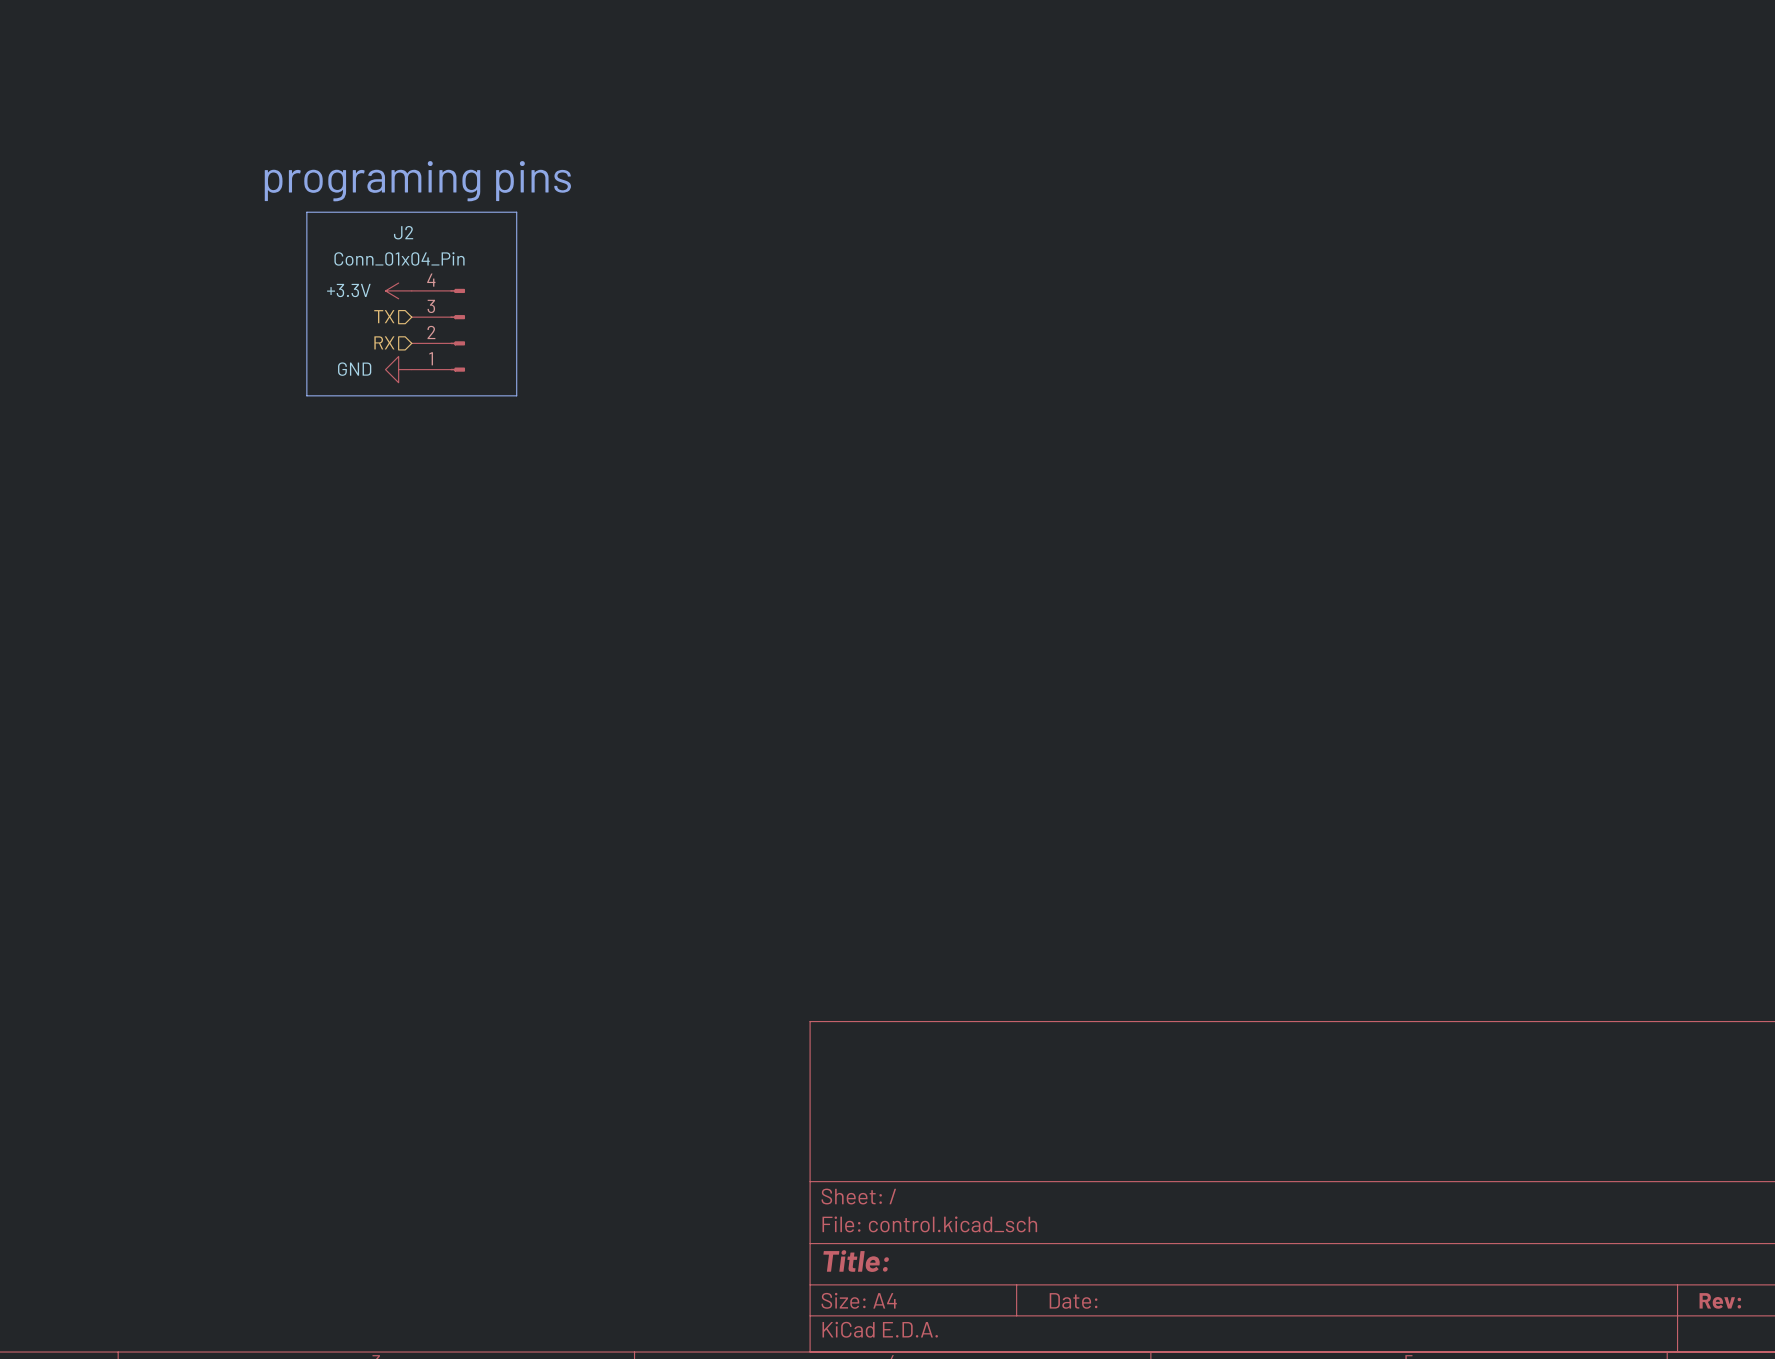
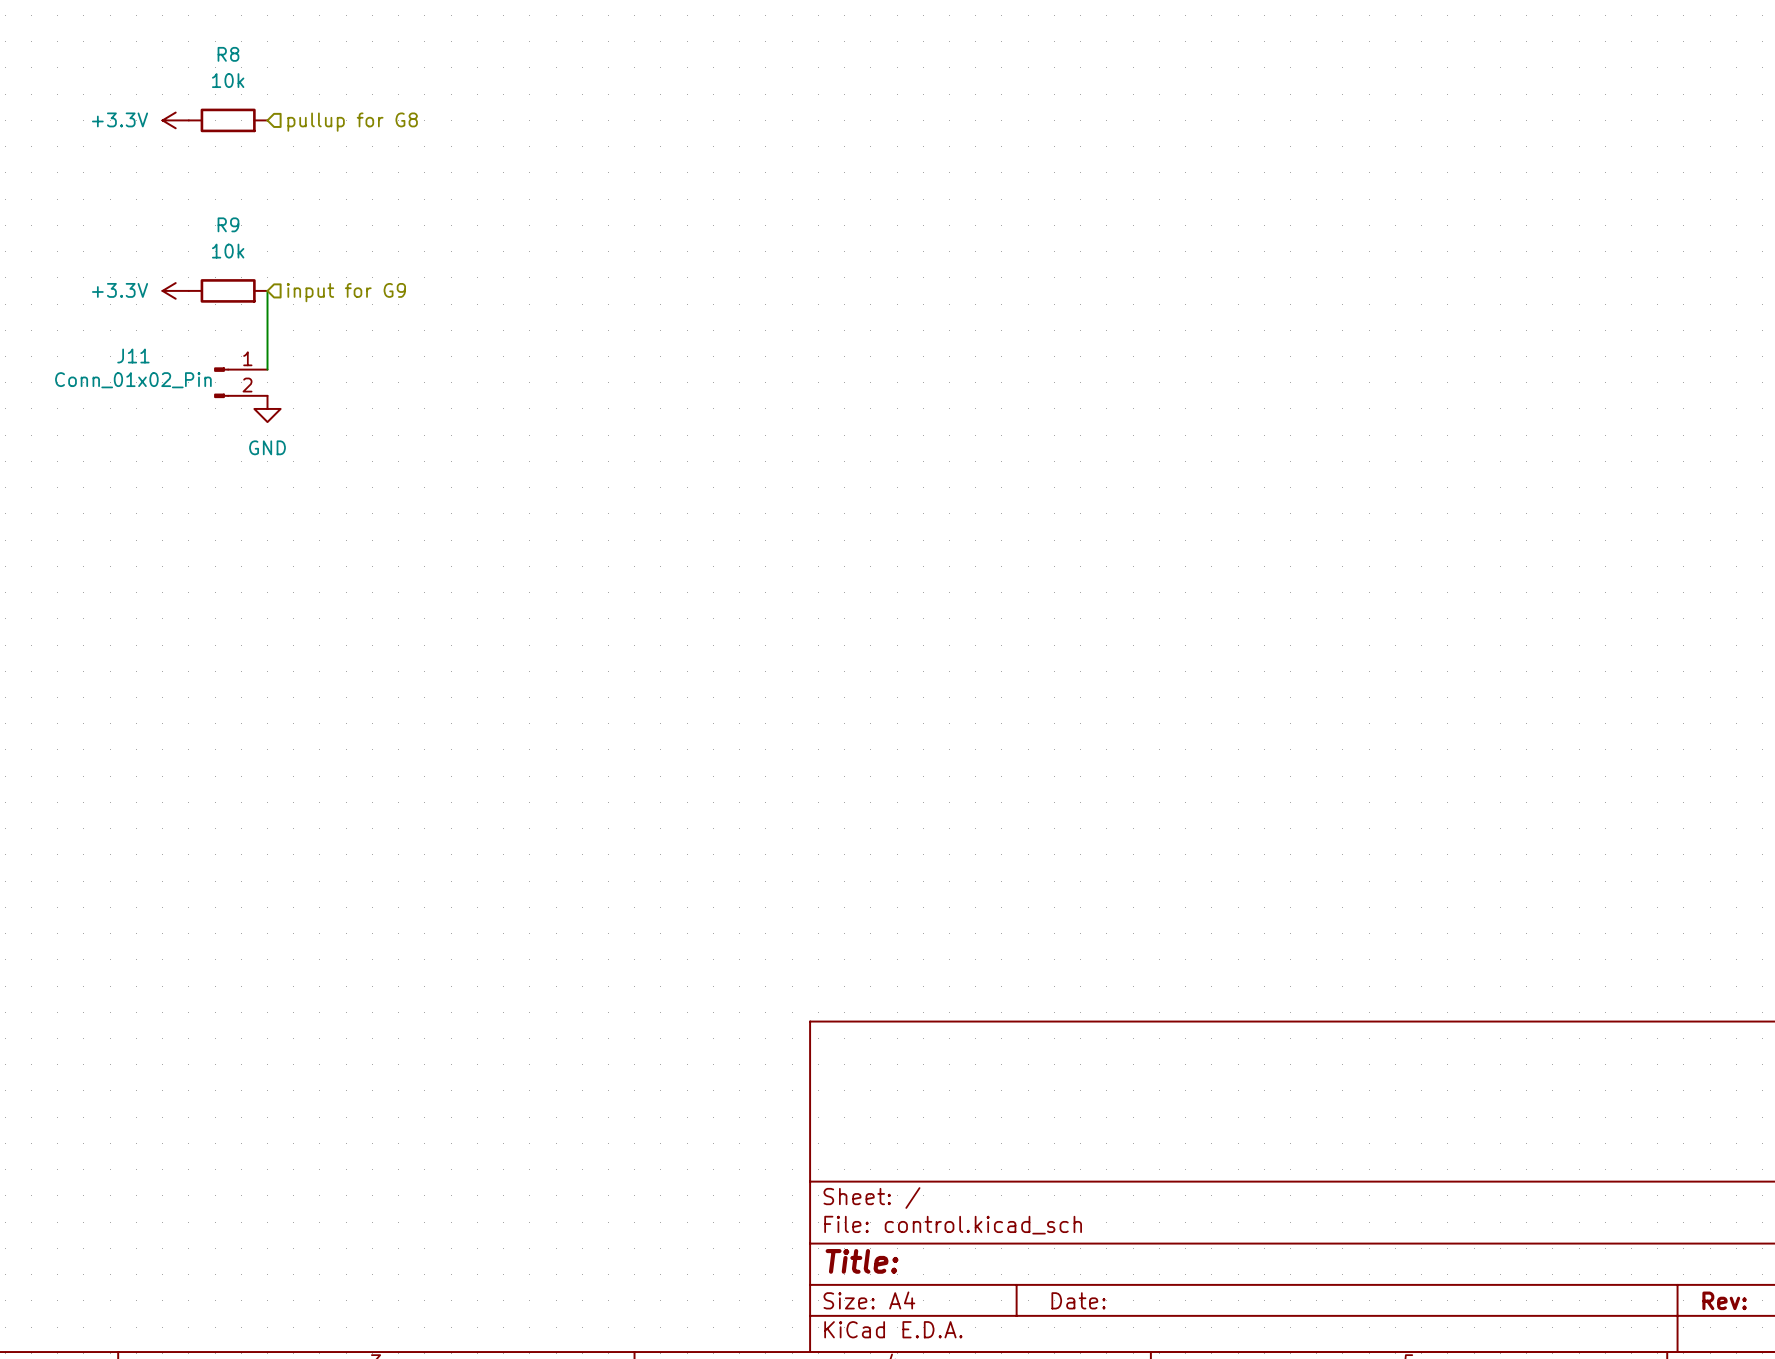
power symbol: none -> +3.3V (175, 120)
R8: none -> 10k (228, 120)
hierarchical label: none -> pullup for G8 (352, 122)
text: programing pins (417, 181) -> none
line: (306, 212) (516, 212) (516, 395) (306, 395) (306, 212) -> none
power symbol: none -> +3.3V (175, 290)
R9: none -> 10k (228, 290)
wire: none -> (267, 290) (267, 369)
power symbol: +3.3V (398, 290) -> none
hierarchical label: none -> input for G9 (346, 292)
hierarchical label: TX (384, 316) -> none
J2: Conn_01x04_Pin (438, 330) -> none
hierarchical label: RX (384, 342) -> none
power symbol rotation: 0° (398, 369) -> 90° counterclockwise (267, 408)
power symbol position: GND (398, 369) -> GND (267, 408)
J11: none -> Conn_01x02_Pin (240, 382)

